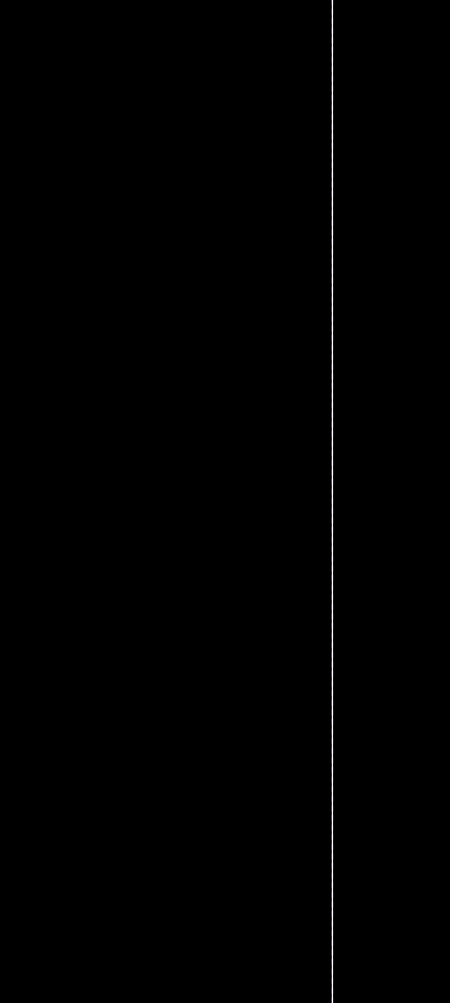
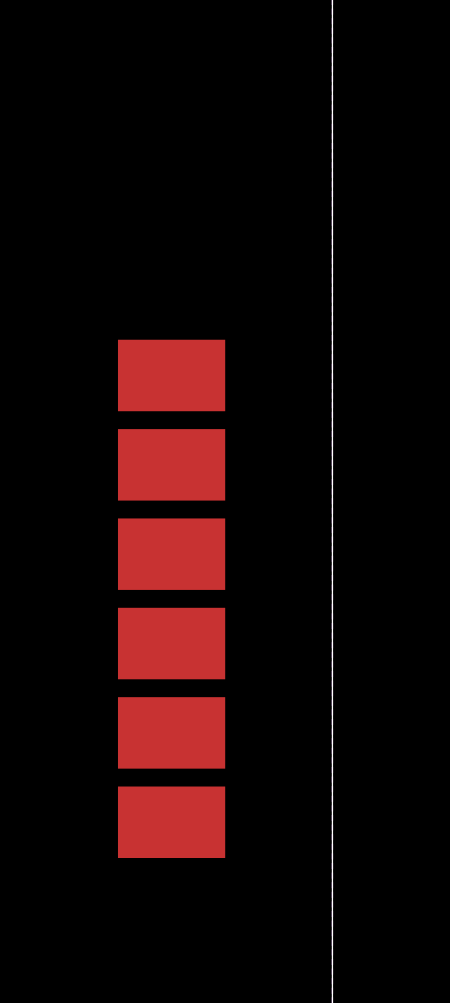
part: none -> (171, 598)

